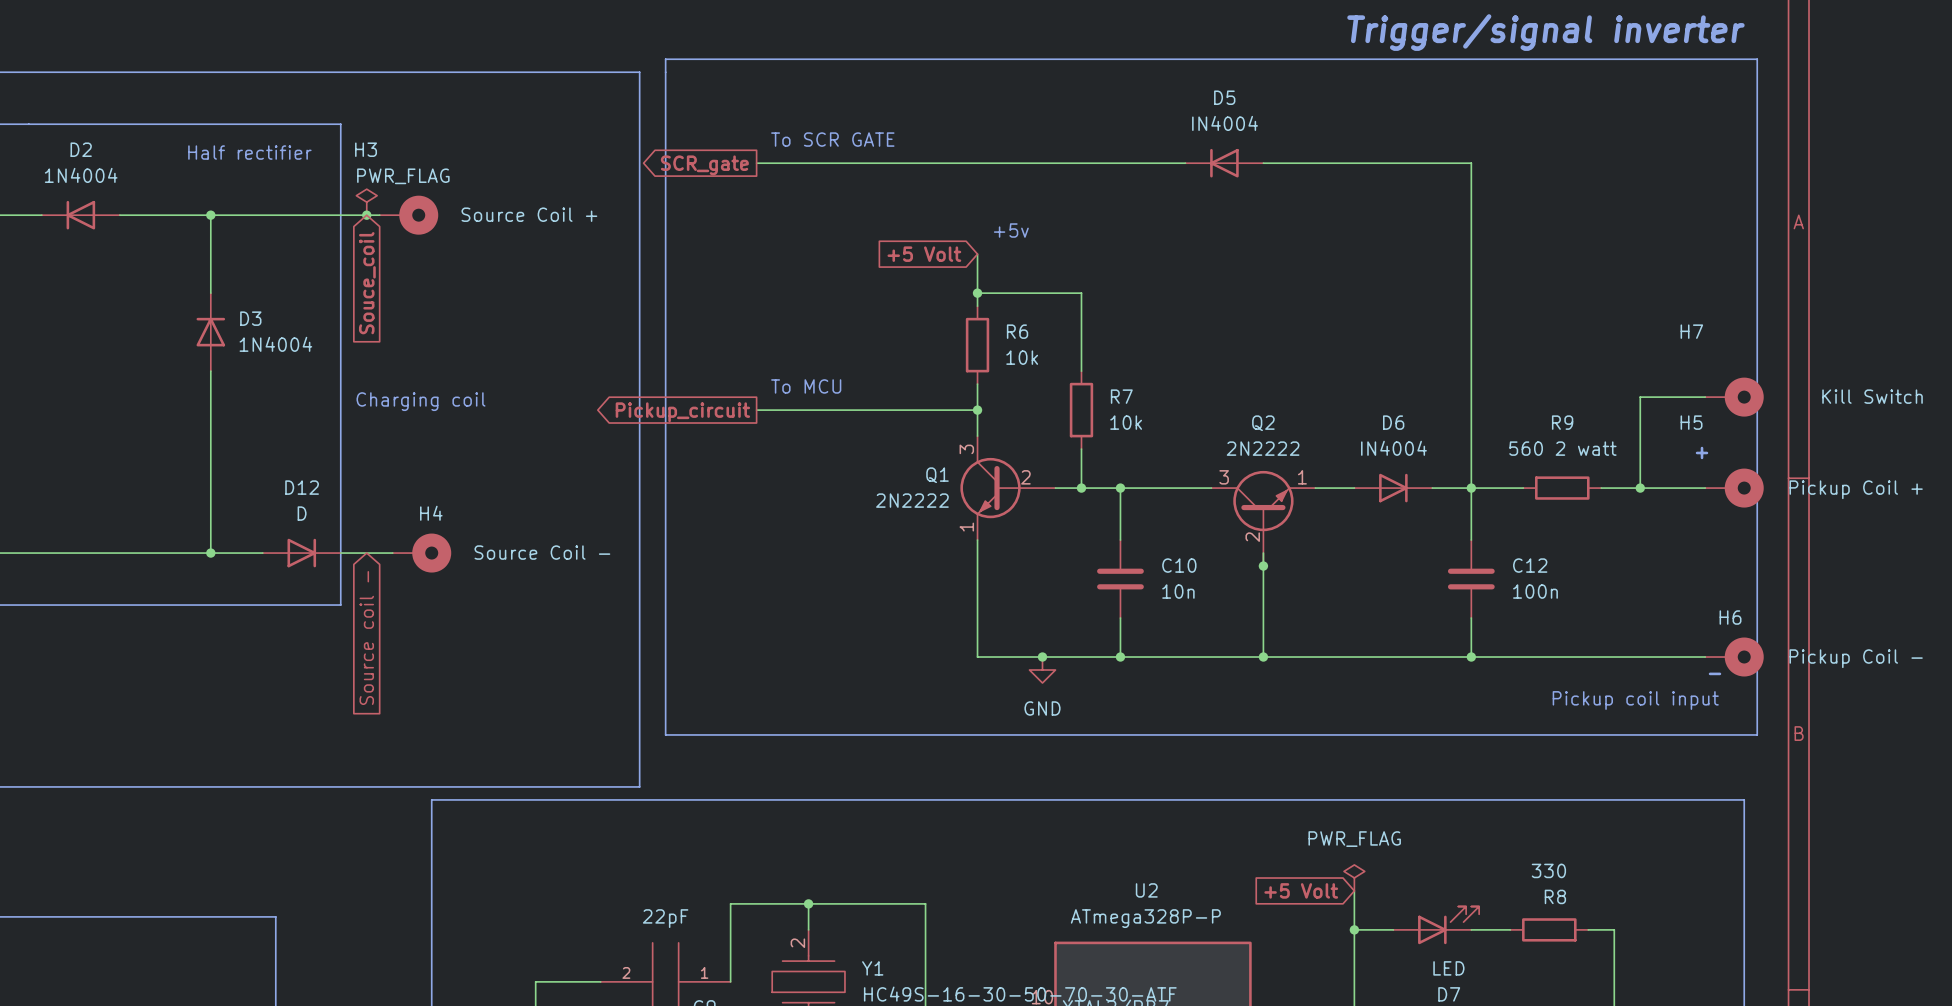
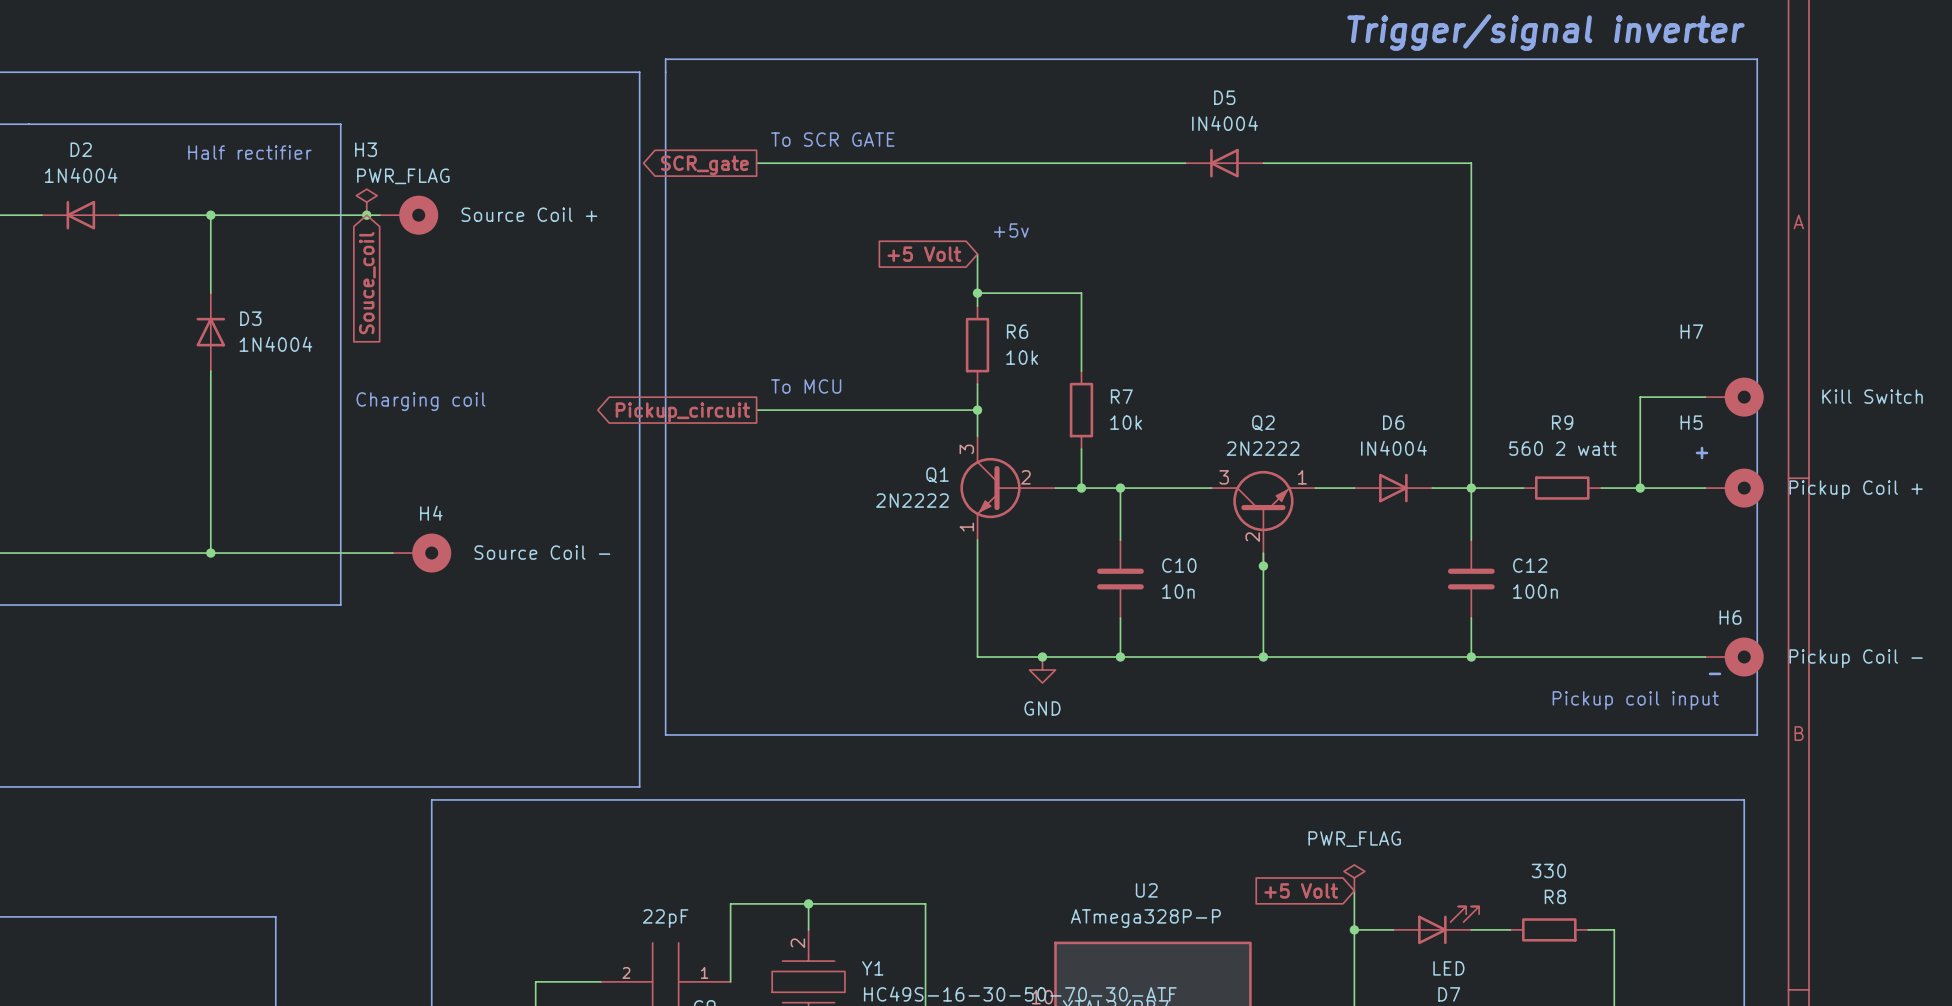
D12: D (301, 553) -> none
global label: Source coil - (366, 638) -> none

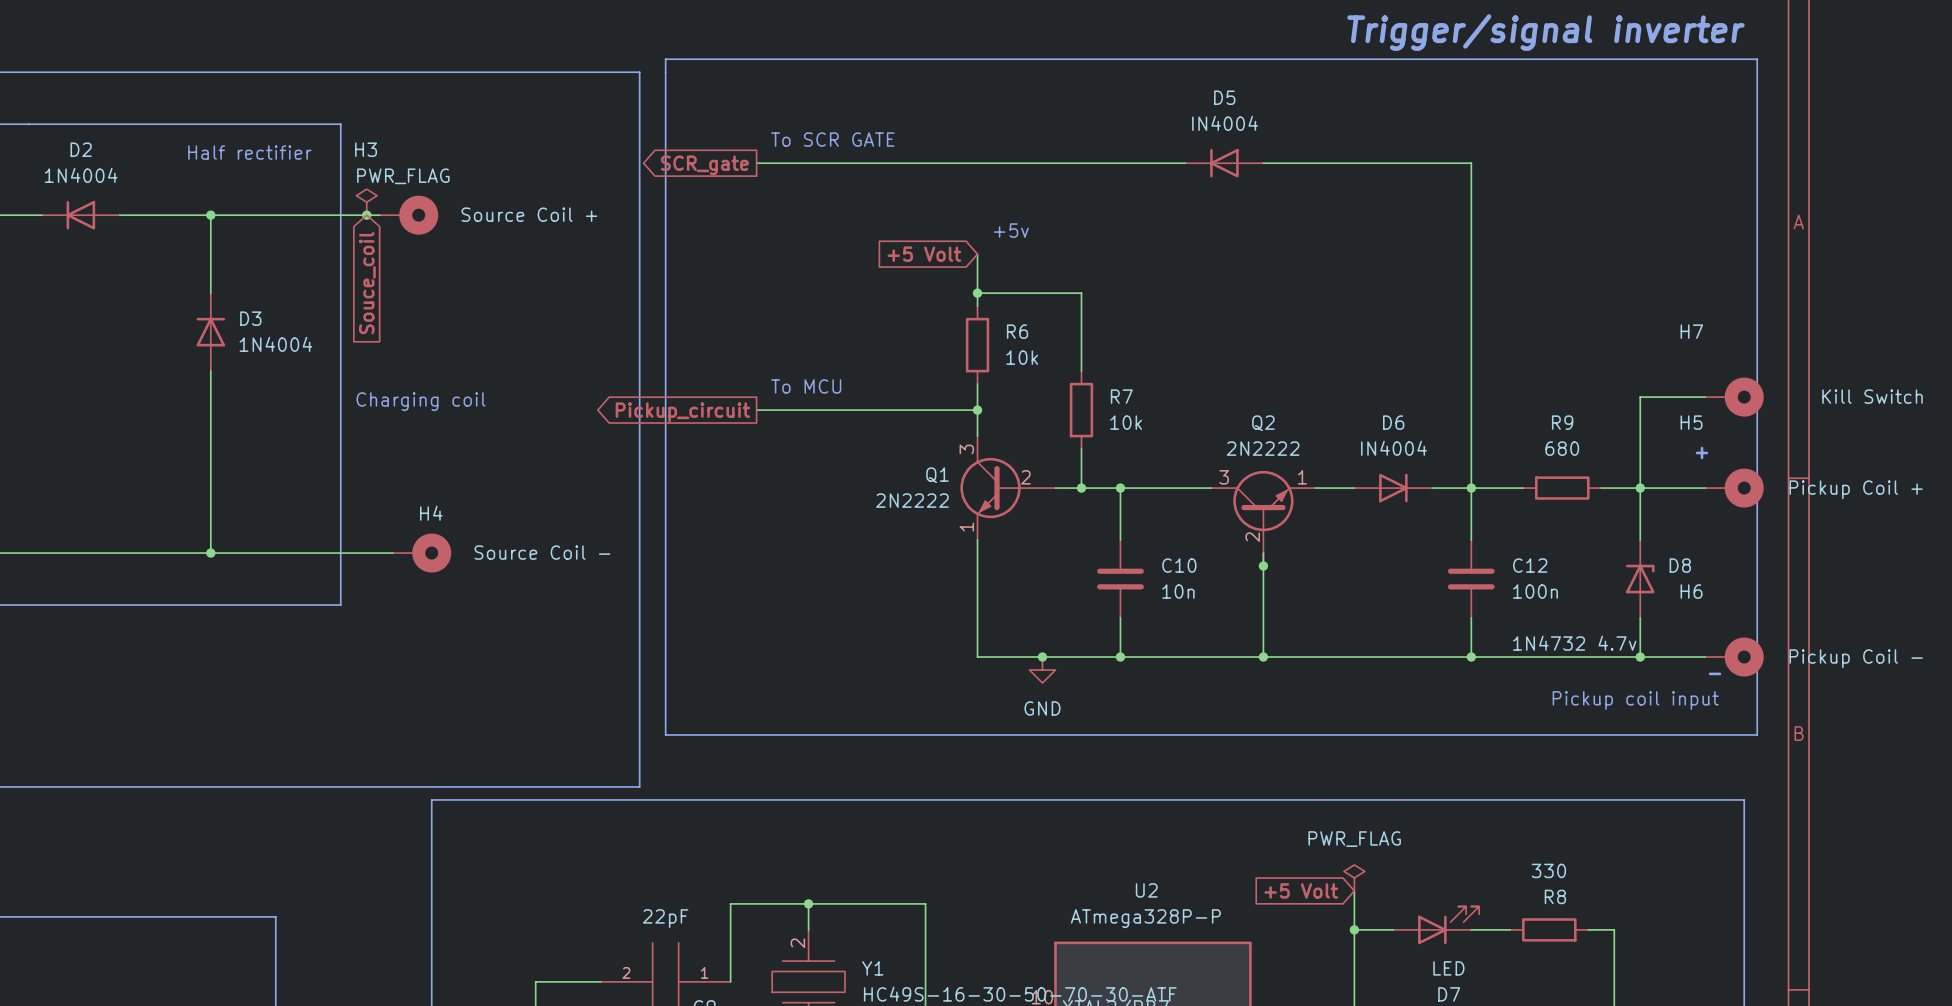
R9 value: 560 2 watt (1562, 448) -> 680 (1562, 448)
wire: none -> (1640, 488) (1640, 540)
D8: none -> 1N4732 4.7v (1640, 579)
H6 name position: H6 (1730, 617) -> H6 (1691, 591)
wire: none -> (1640, 618) (1640, 657)
junction: none -> (1640, 657)

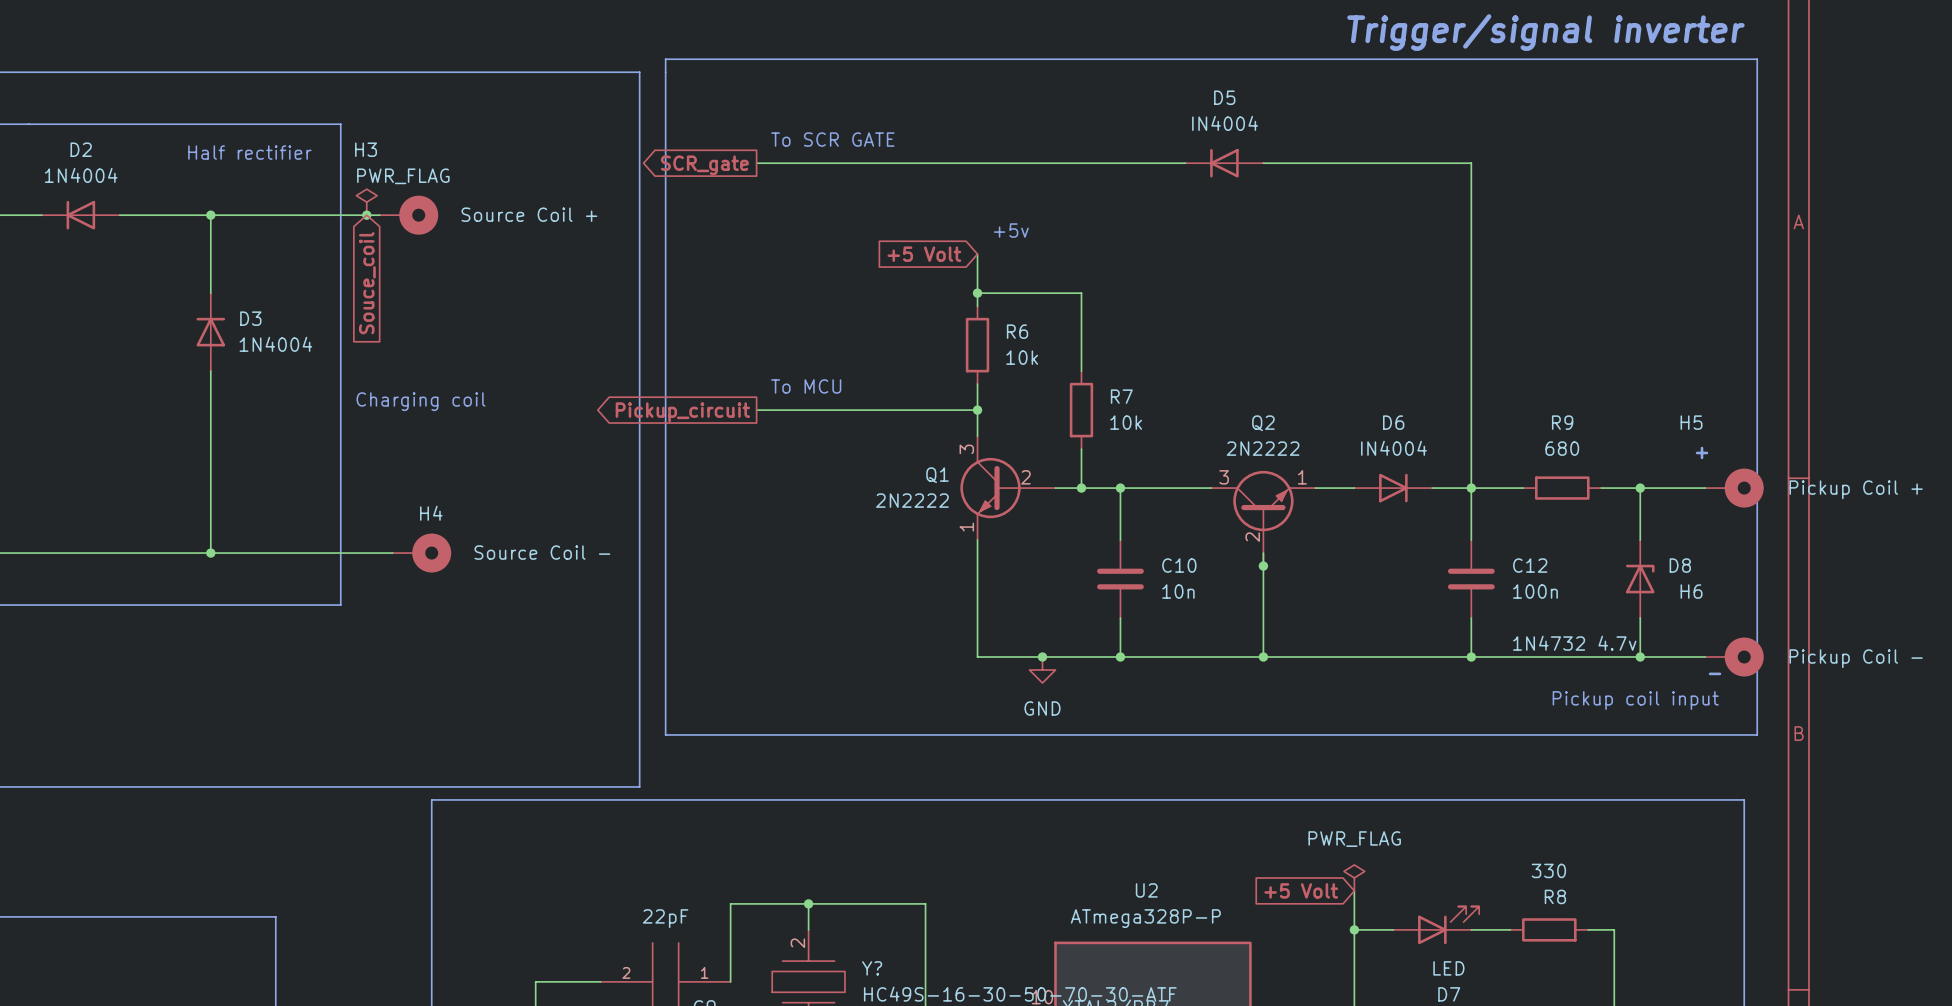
wire: (1705, 397) (1640, 397) (1640, 488) -> none
H7: Kill Switch (1734, 397) -> none
Y1 name: Y1 (872, 968) -> Y? (872, 968)

